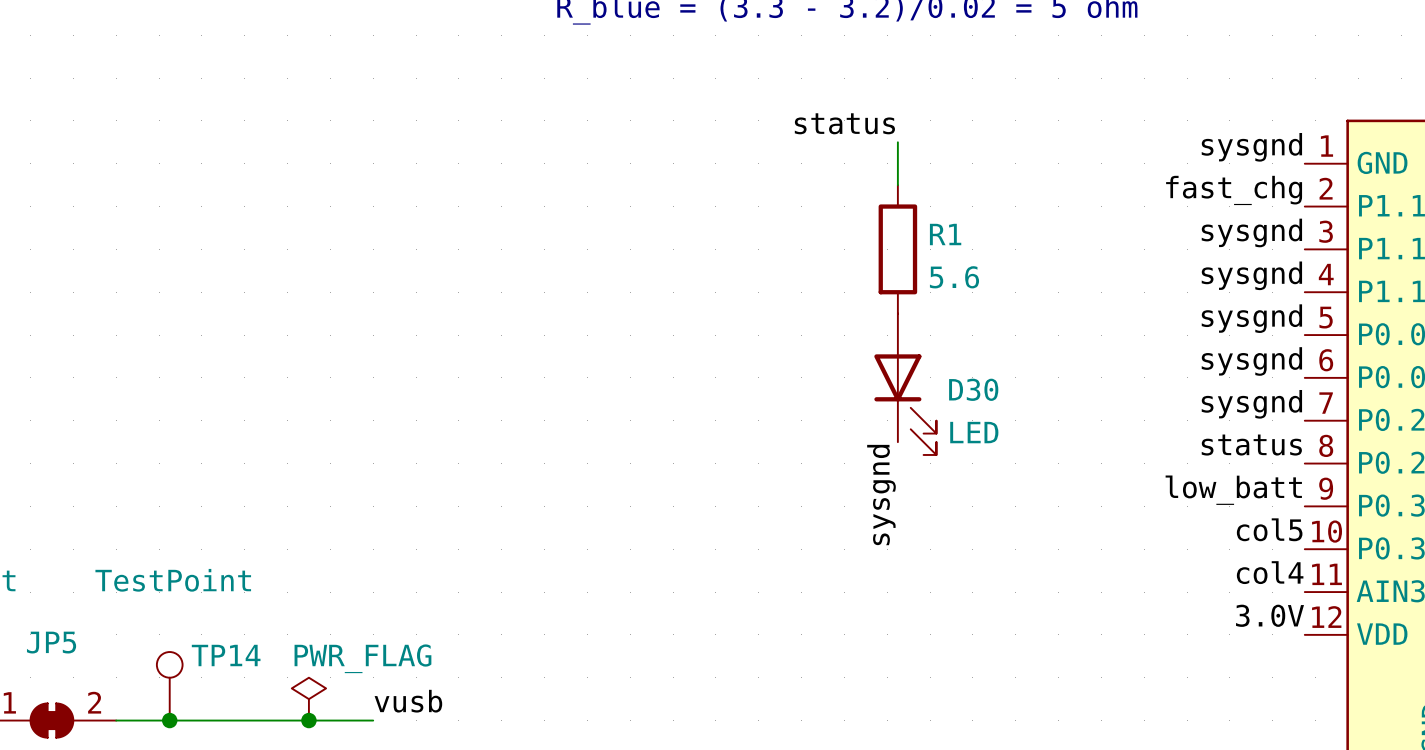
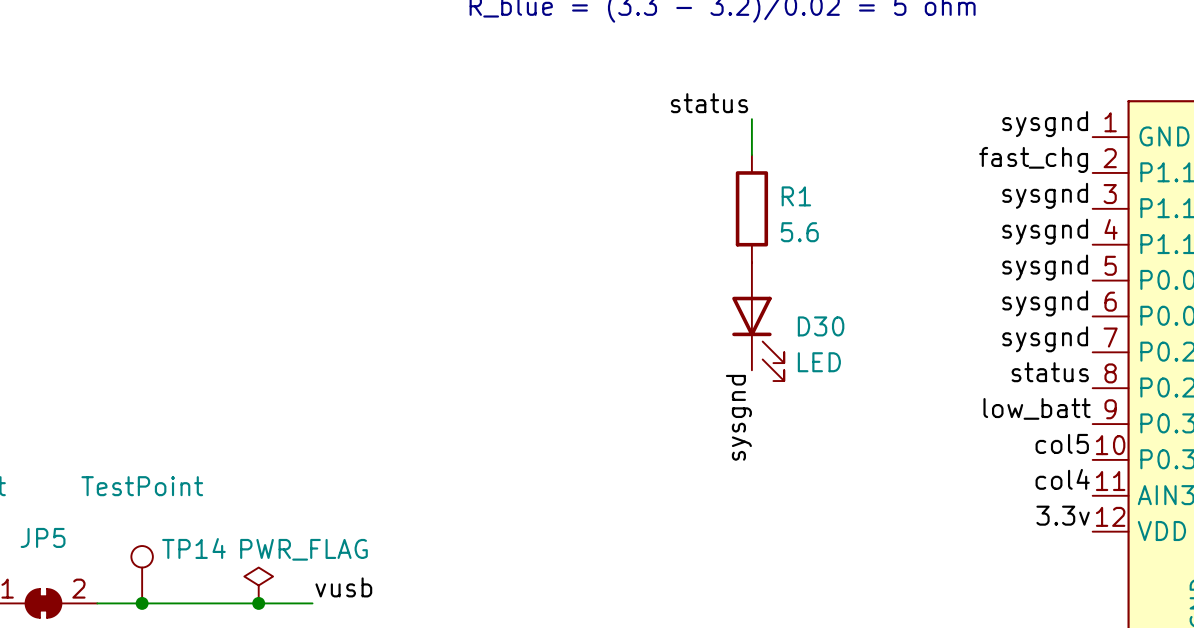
label: 3.0V (1270, 615) -> 3.3v (1063, 515)

